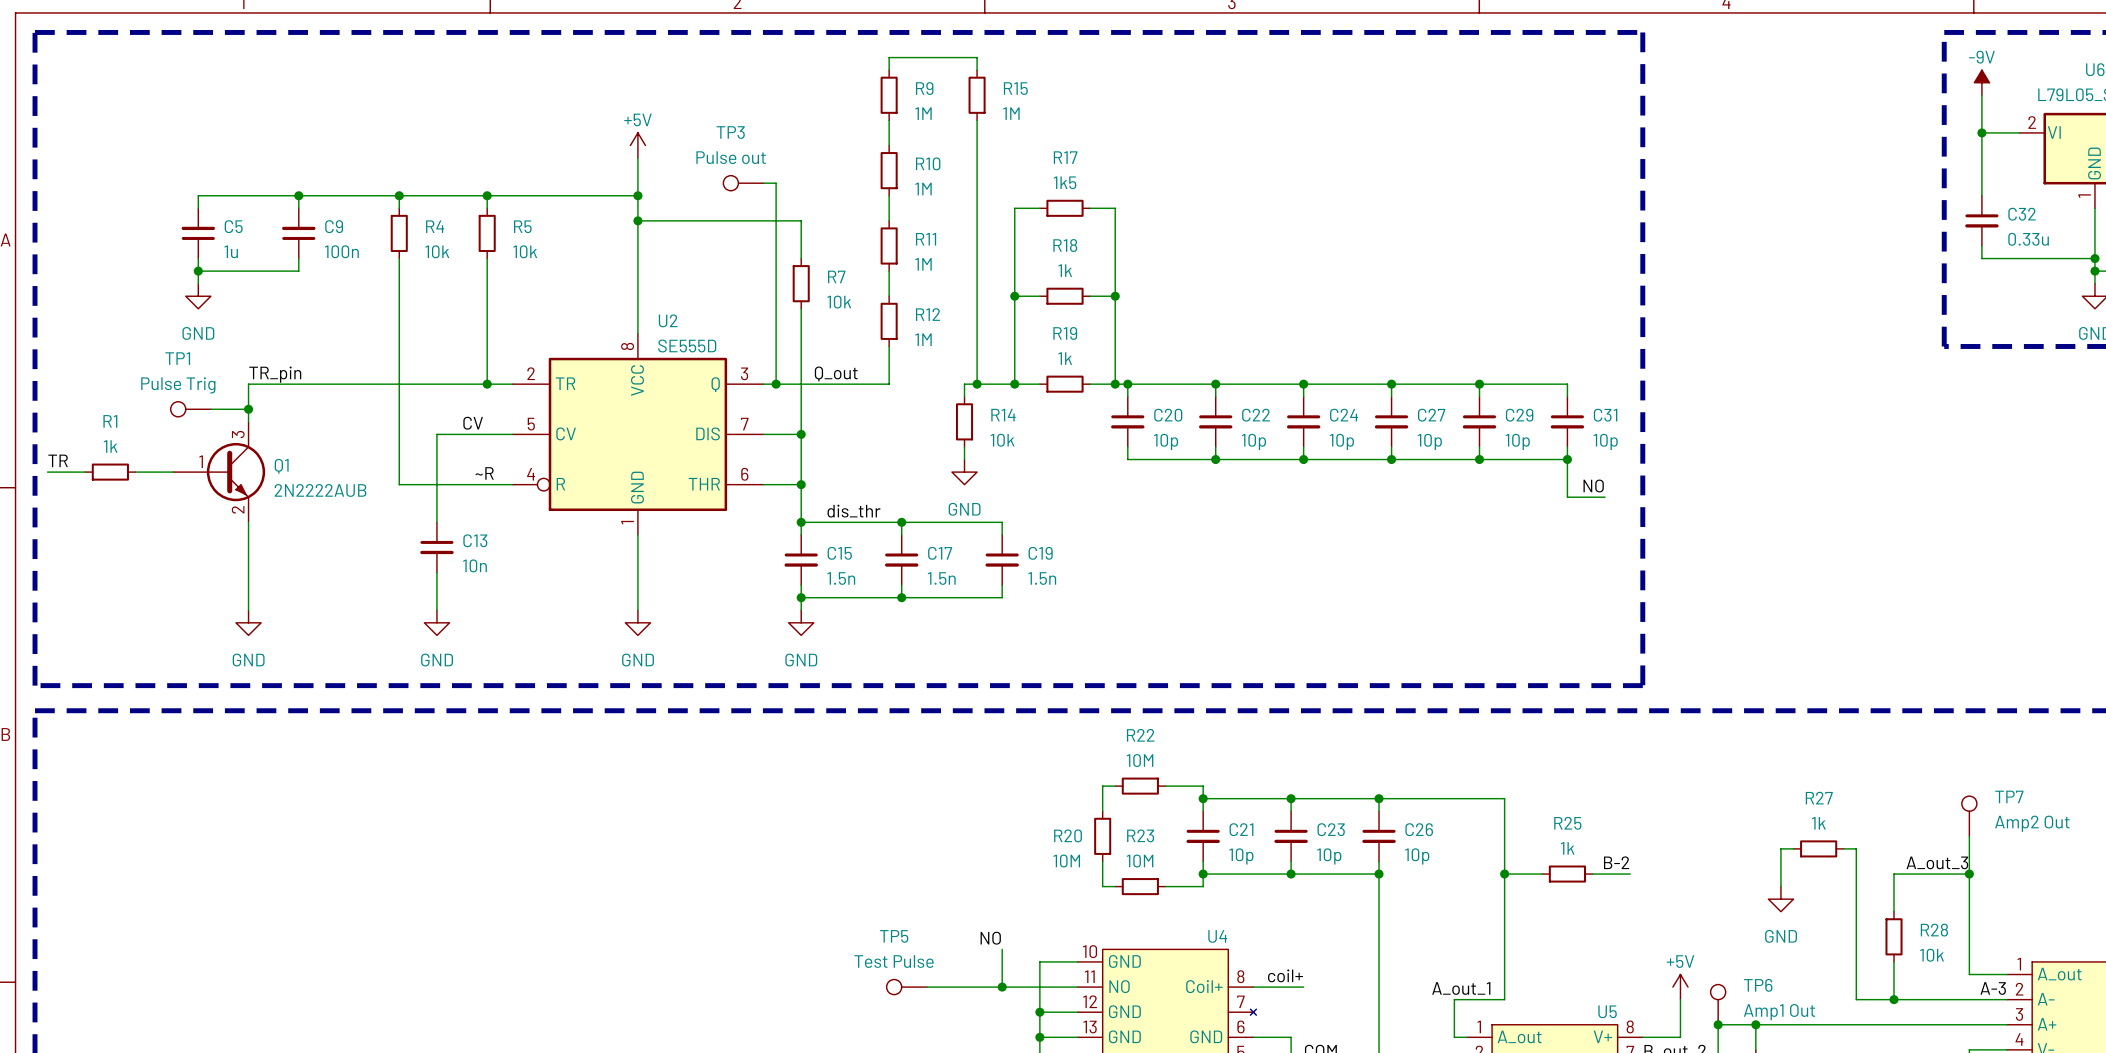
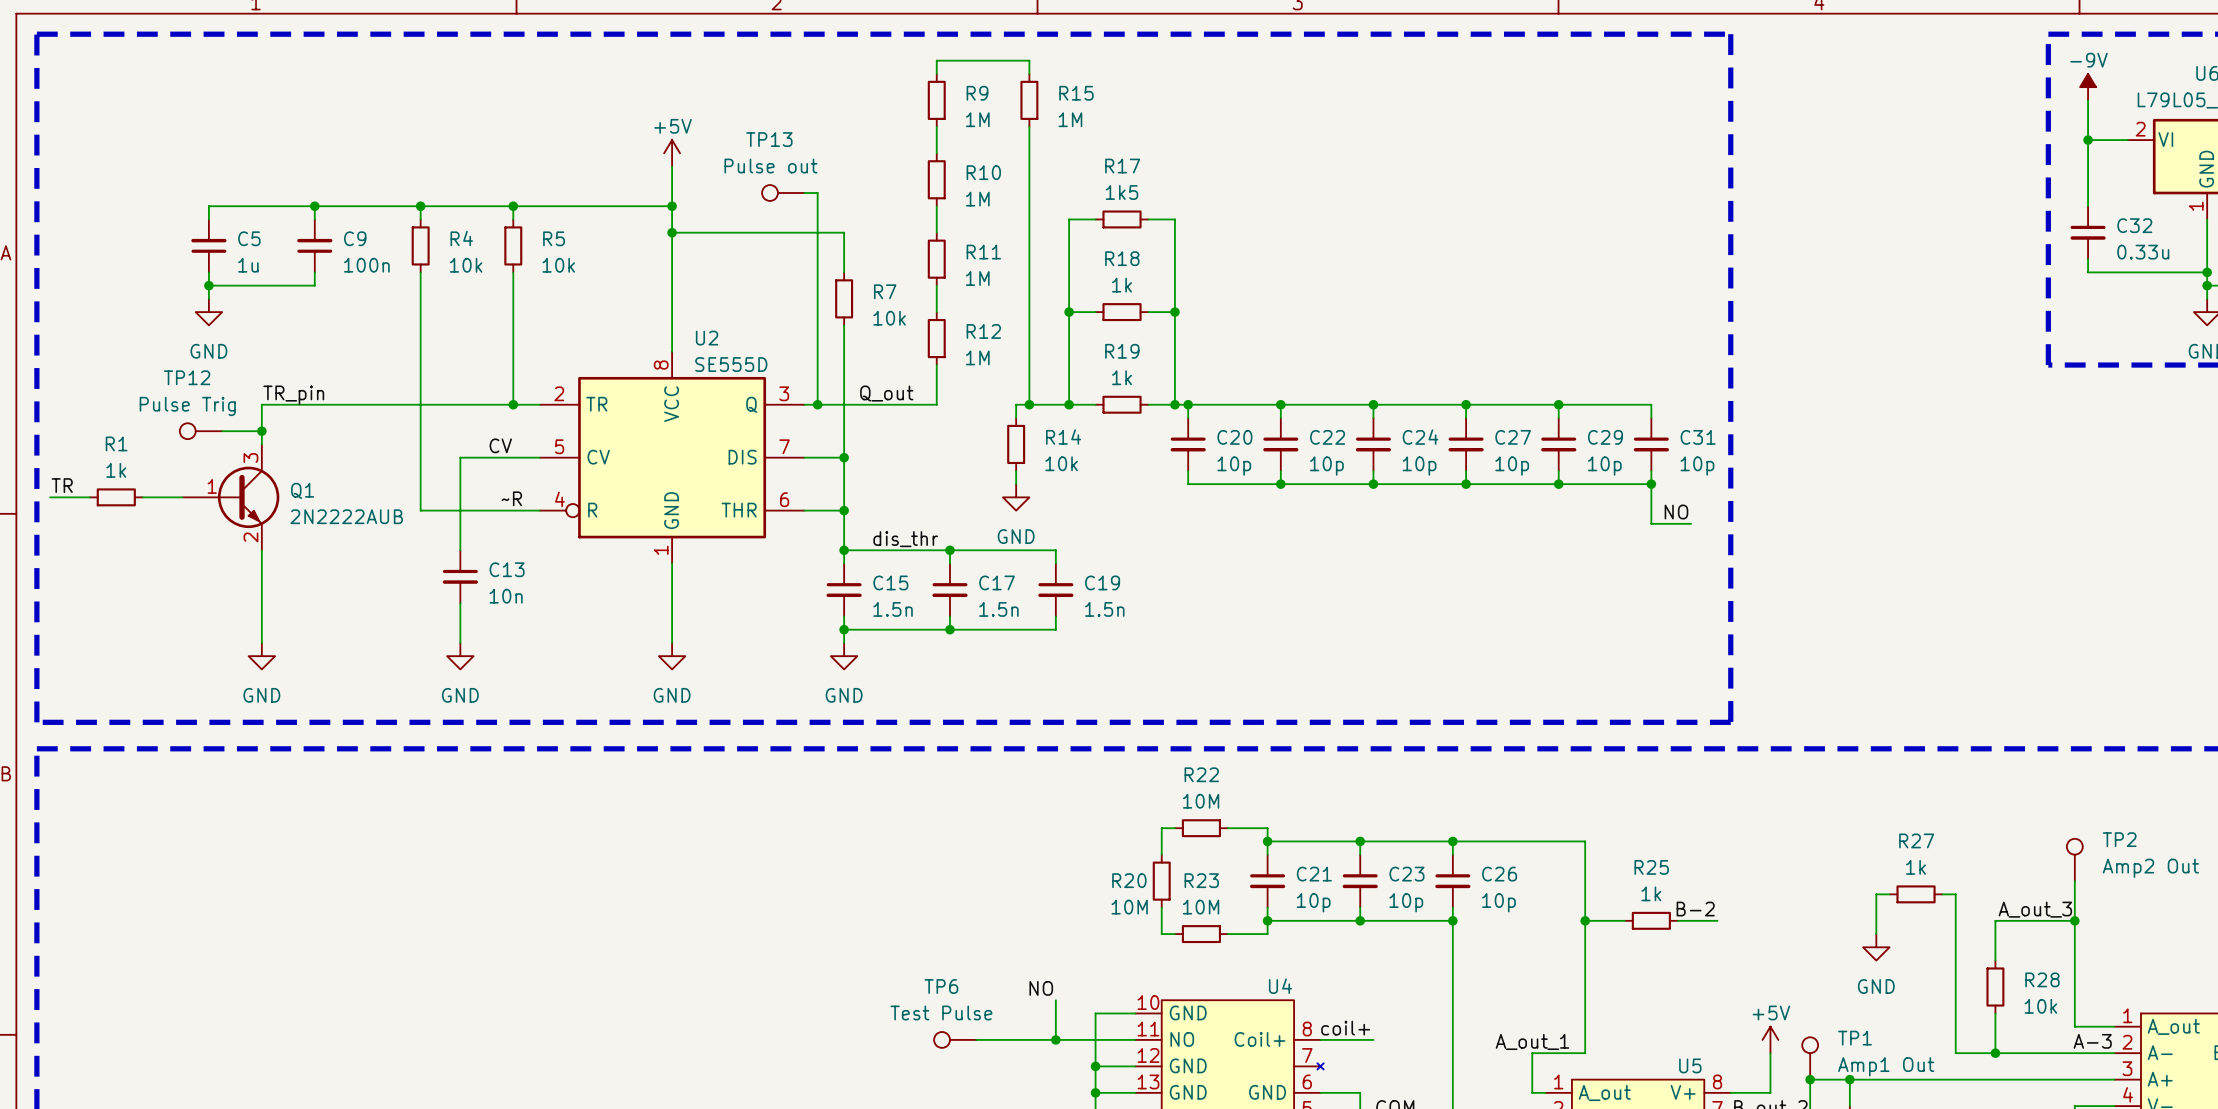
TP3 name: TP3 (730, 132) -> TP13 (769, 139)
TP1 name: TP1 (177, 358) -> TP12 (187, 377)
TP7 name: TP7 (2009, 796) -> TP2 (2119, 839)
TP5 name: TP5 (894, 936) -> TP6 (941, 986)
TP6 name: TP6 (1758, 985) -> TP1 (1855, 1038)

